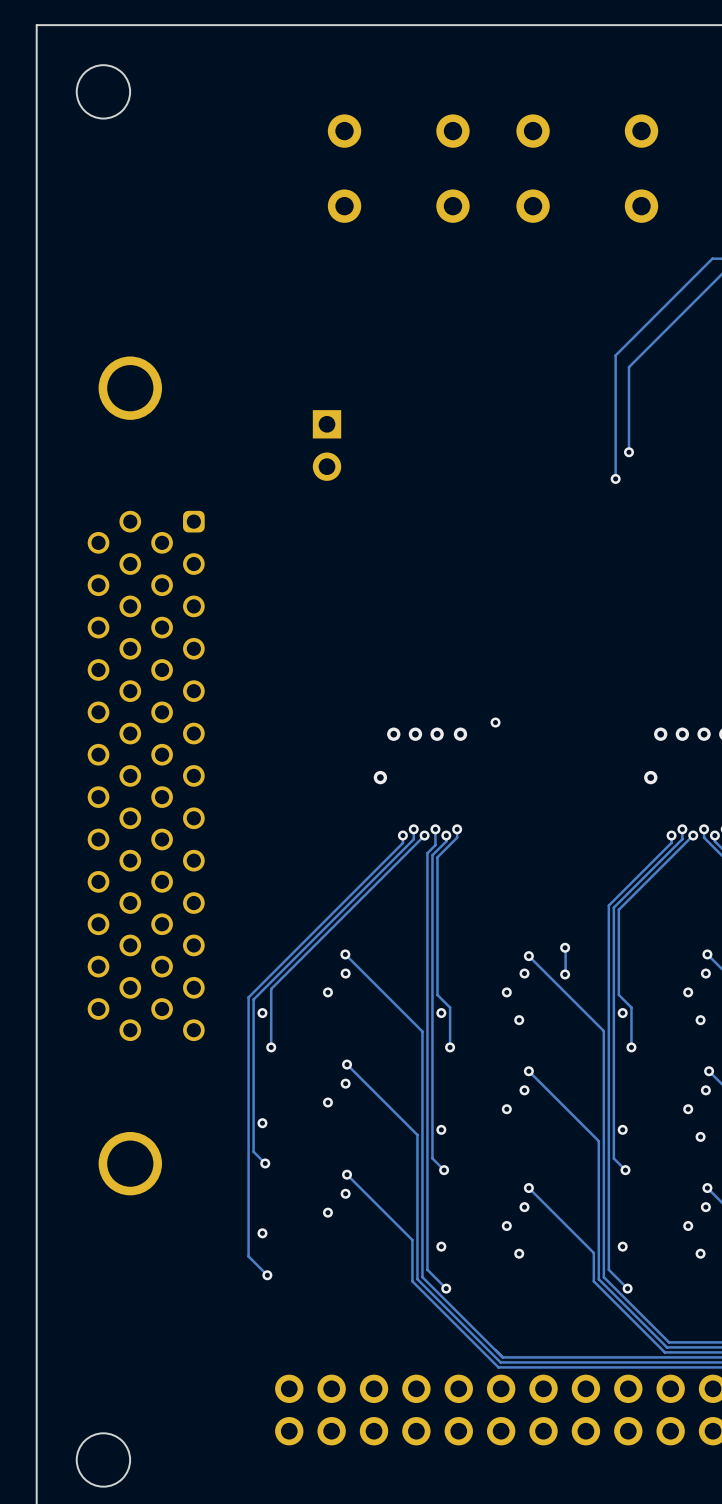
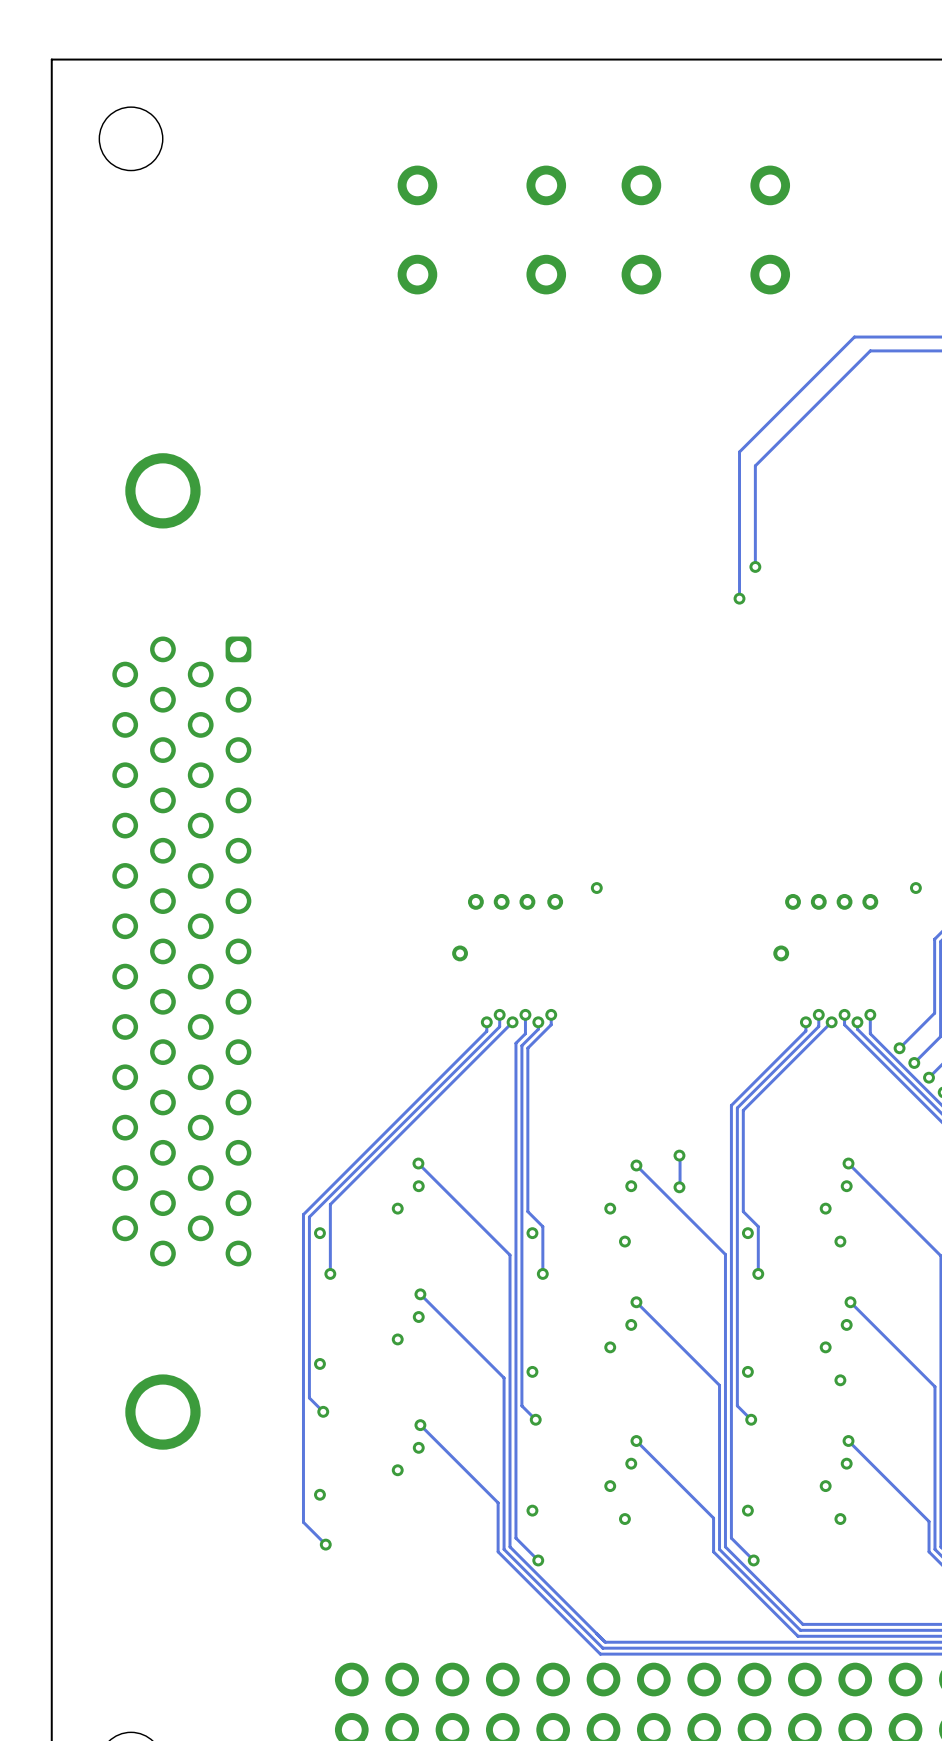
part: (327, 445) -> none

